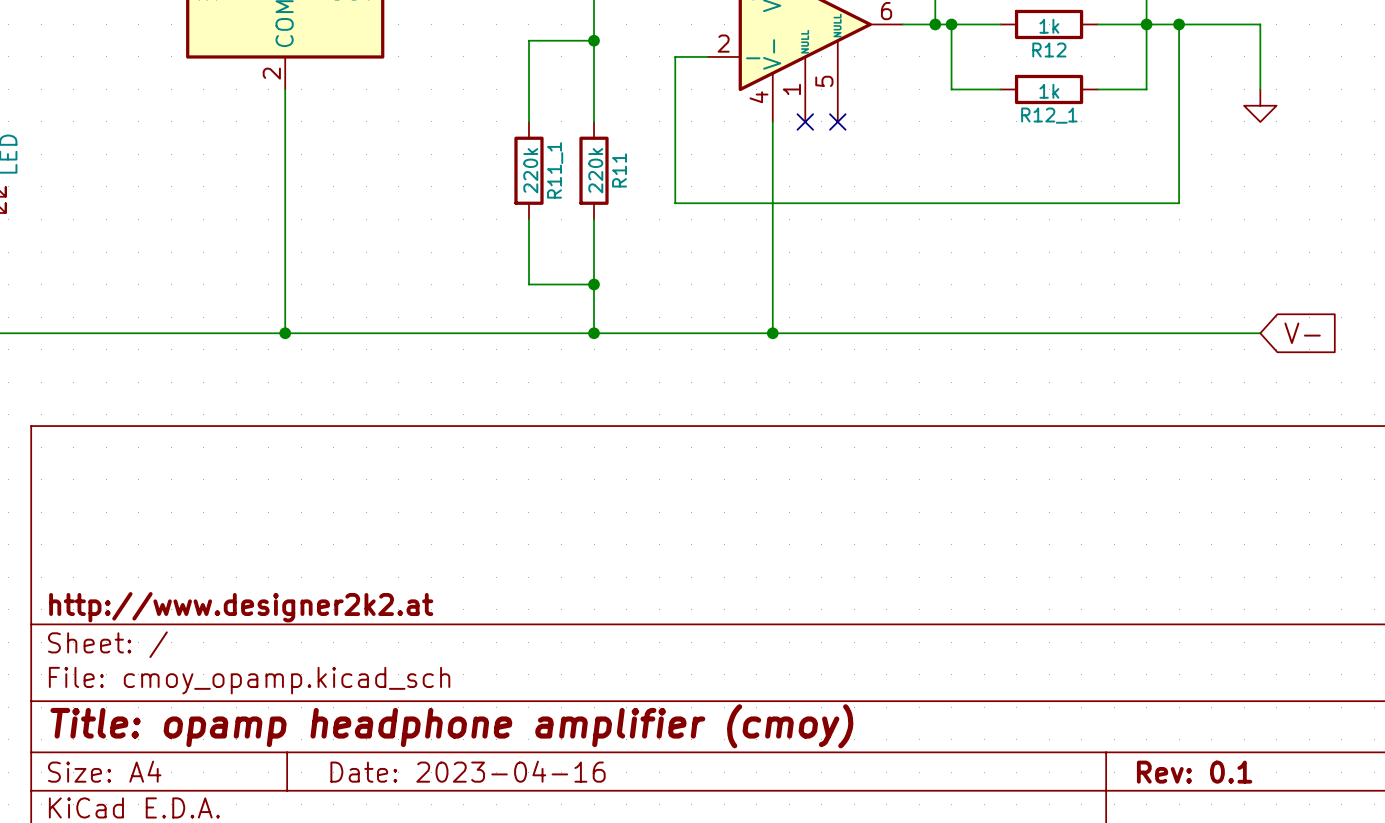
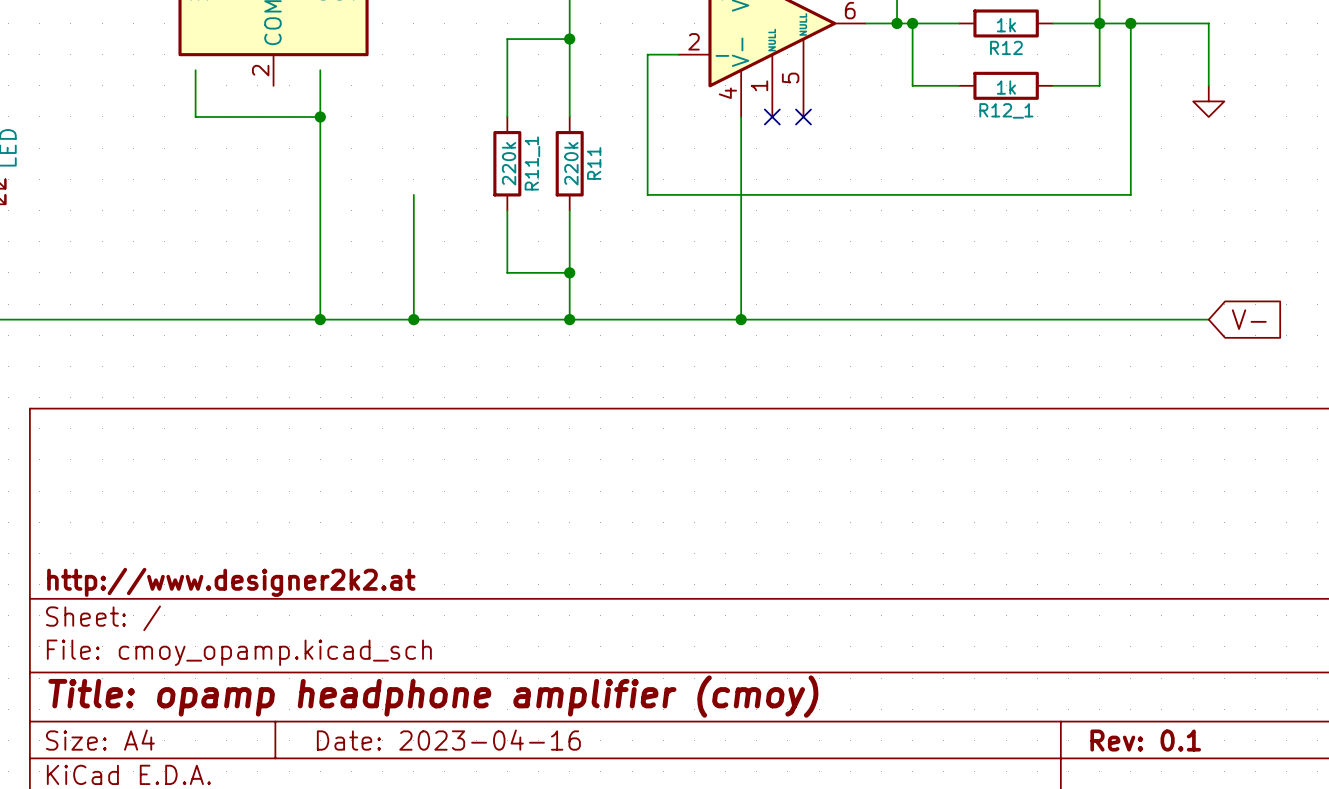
wire: none -> (195, 70) (195, 116) (320, 116)
wire: none -> (320, 70) (320, 319)
wire: (285, 89) (285, 333) -> none
junction: none -> (320, 116)
wire: none -> (413, 194) (413, 319)
junction position: (285, 333) -> (320, 319)
junction: none -> (413, 319)

